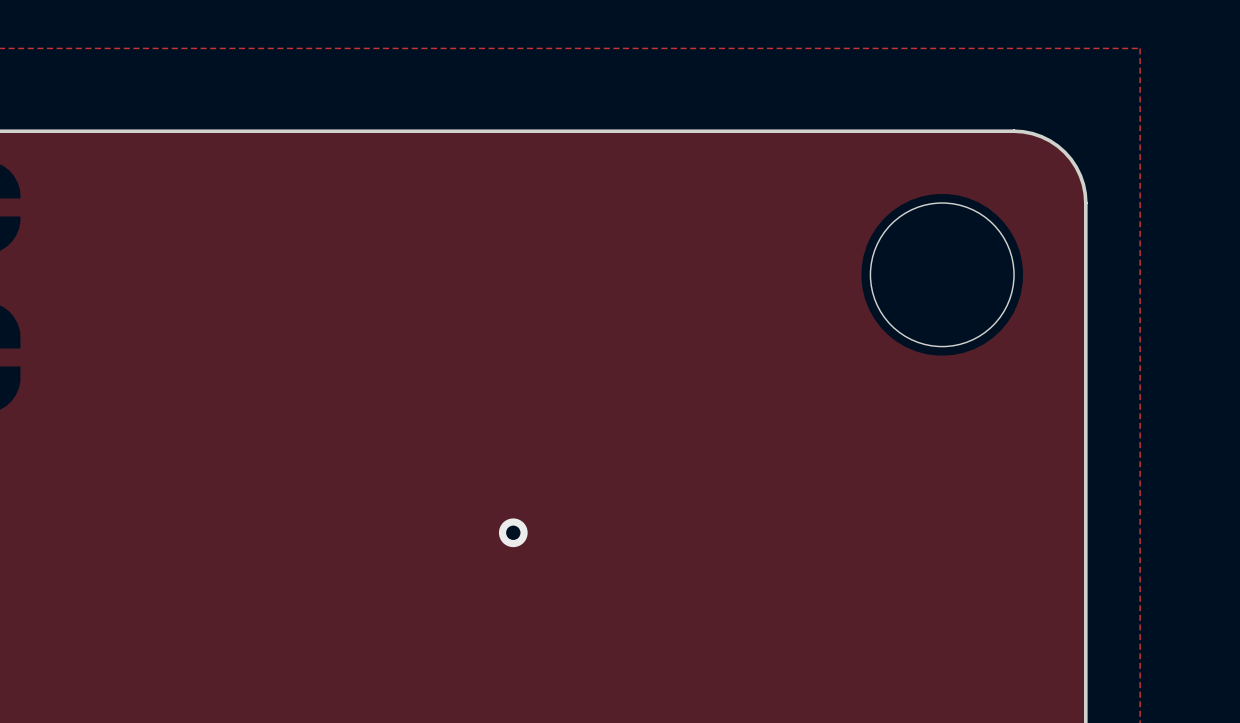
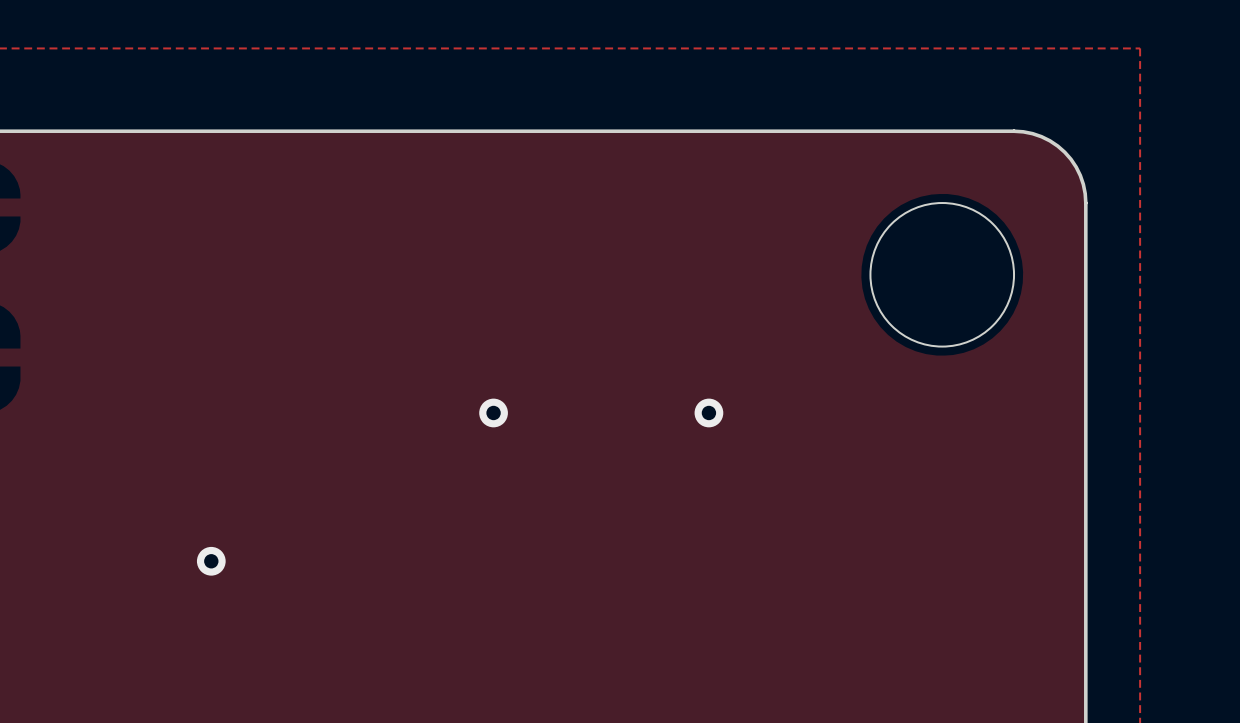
via: none -> (493, 412)
via: none -> (708, 412)
via: (513, 532) -> none
via: none -> (211, 561)

